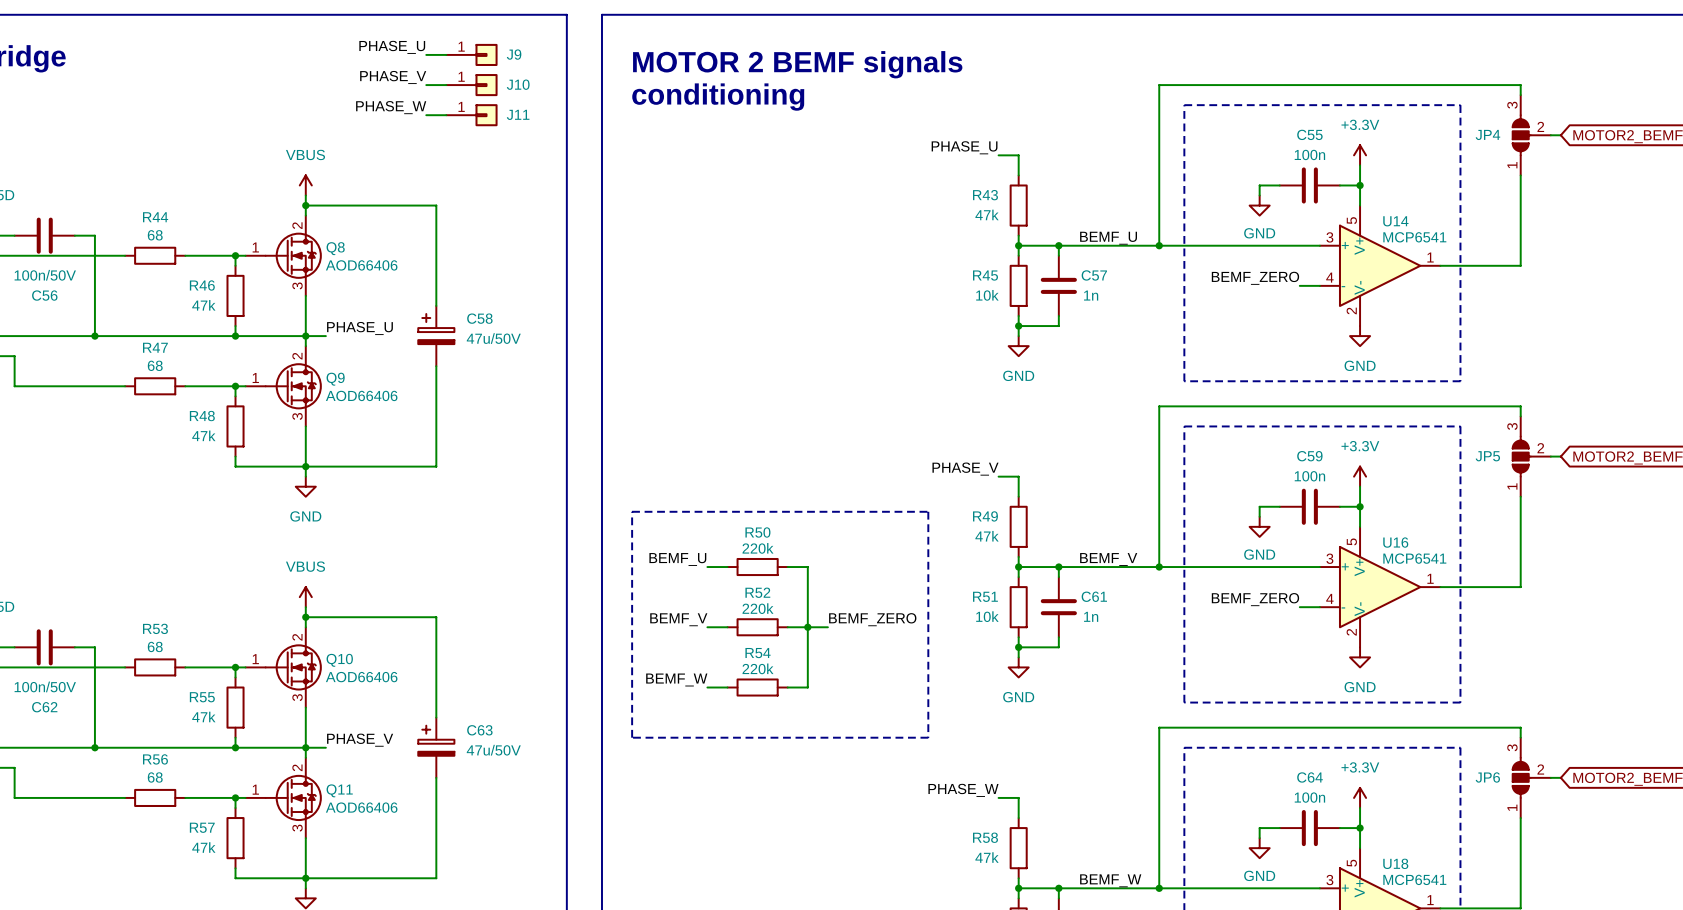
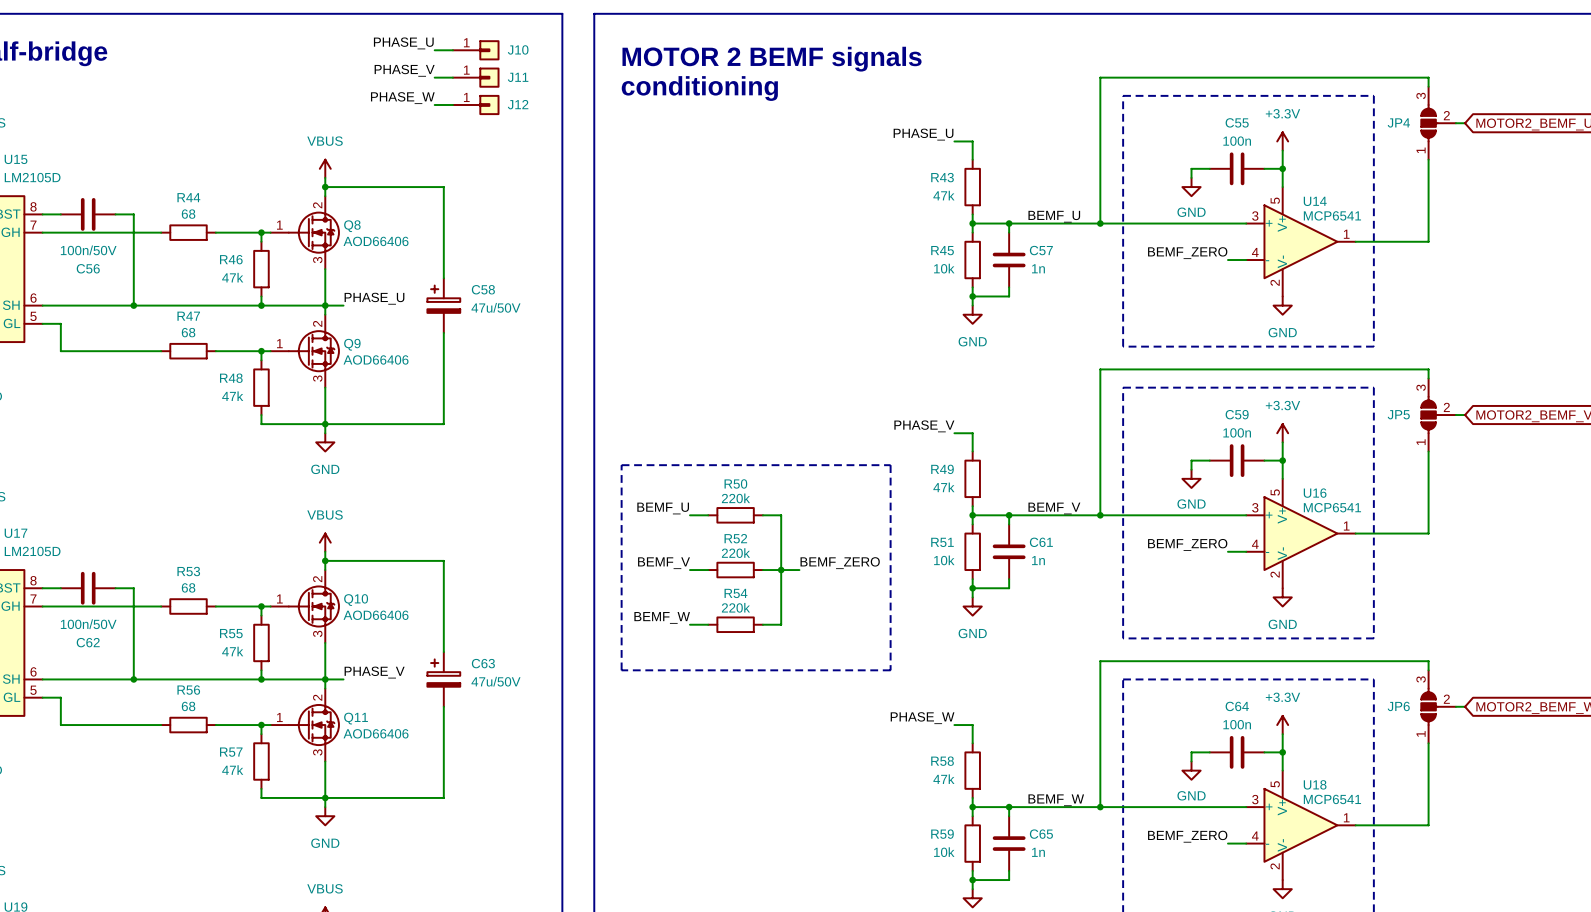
J9 name: J9 (514, 54) -> J10 (518, 49)
J10 name: J10 (518, 84) -> J11 (518, 77)
J11 name: J11 (518, 114) -> J12 (518, 104)

